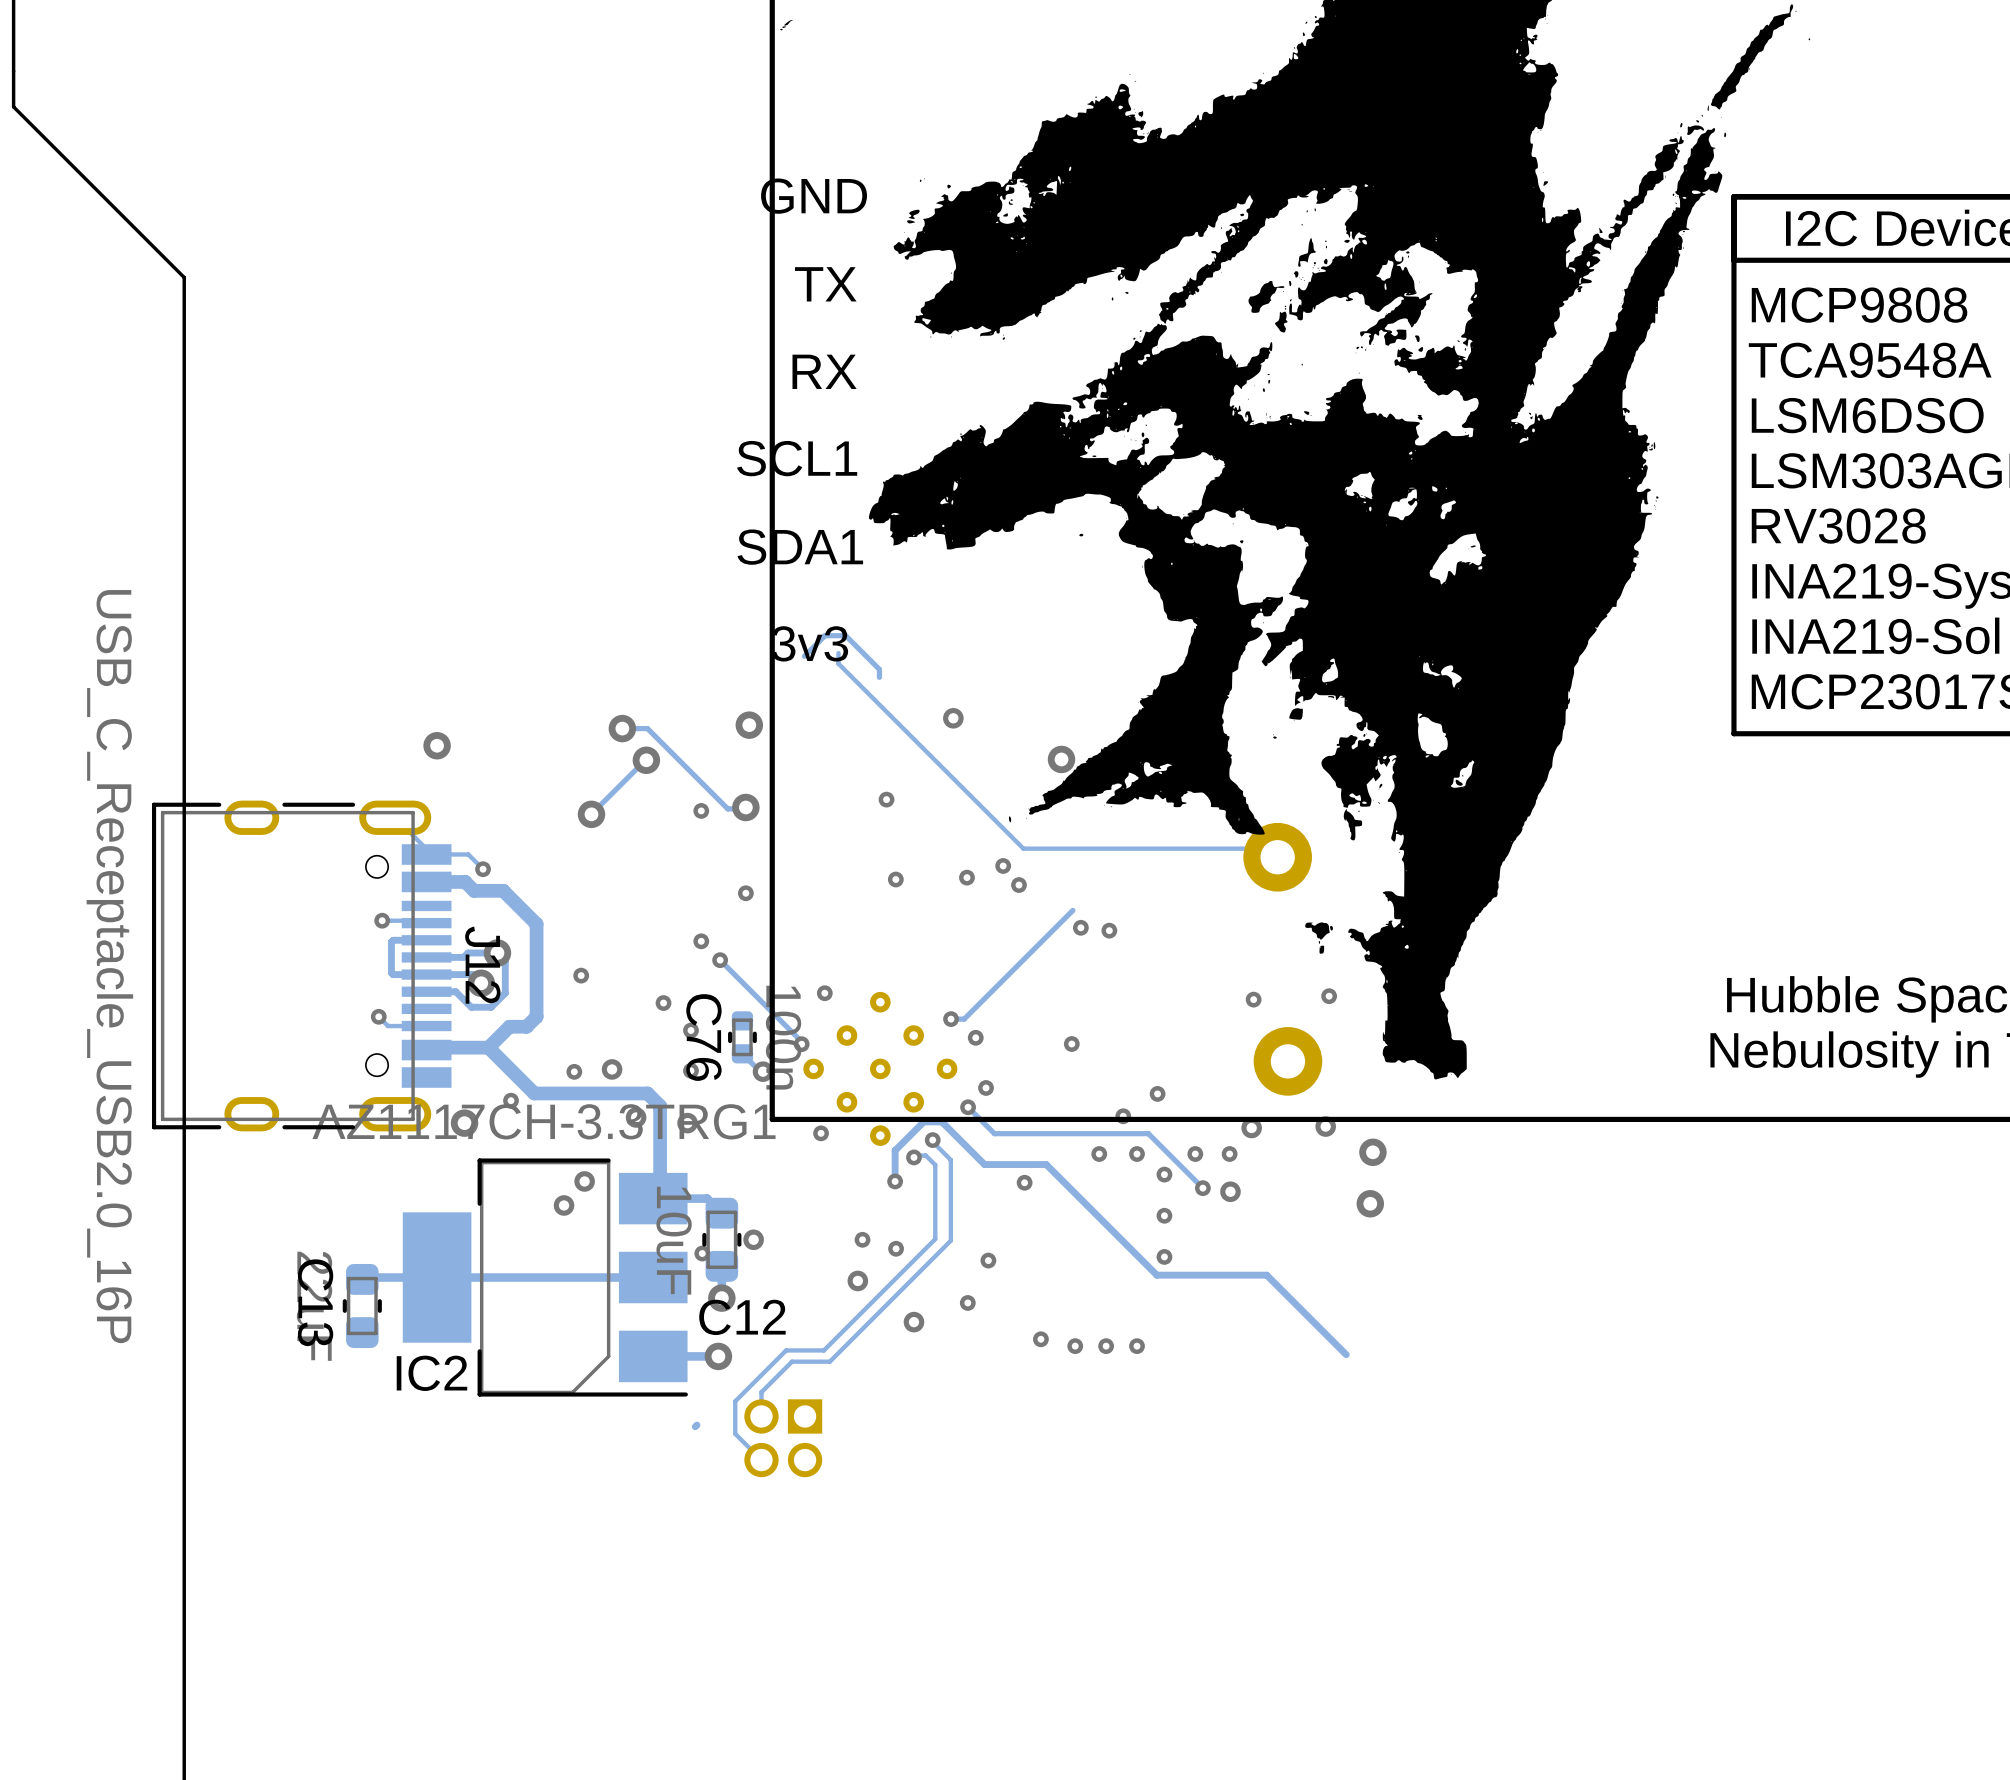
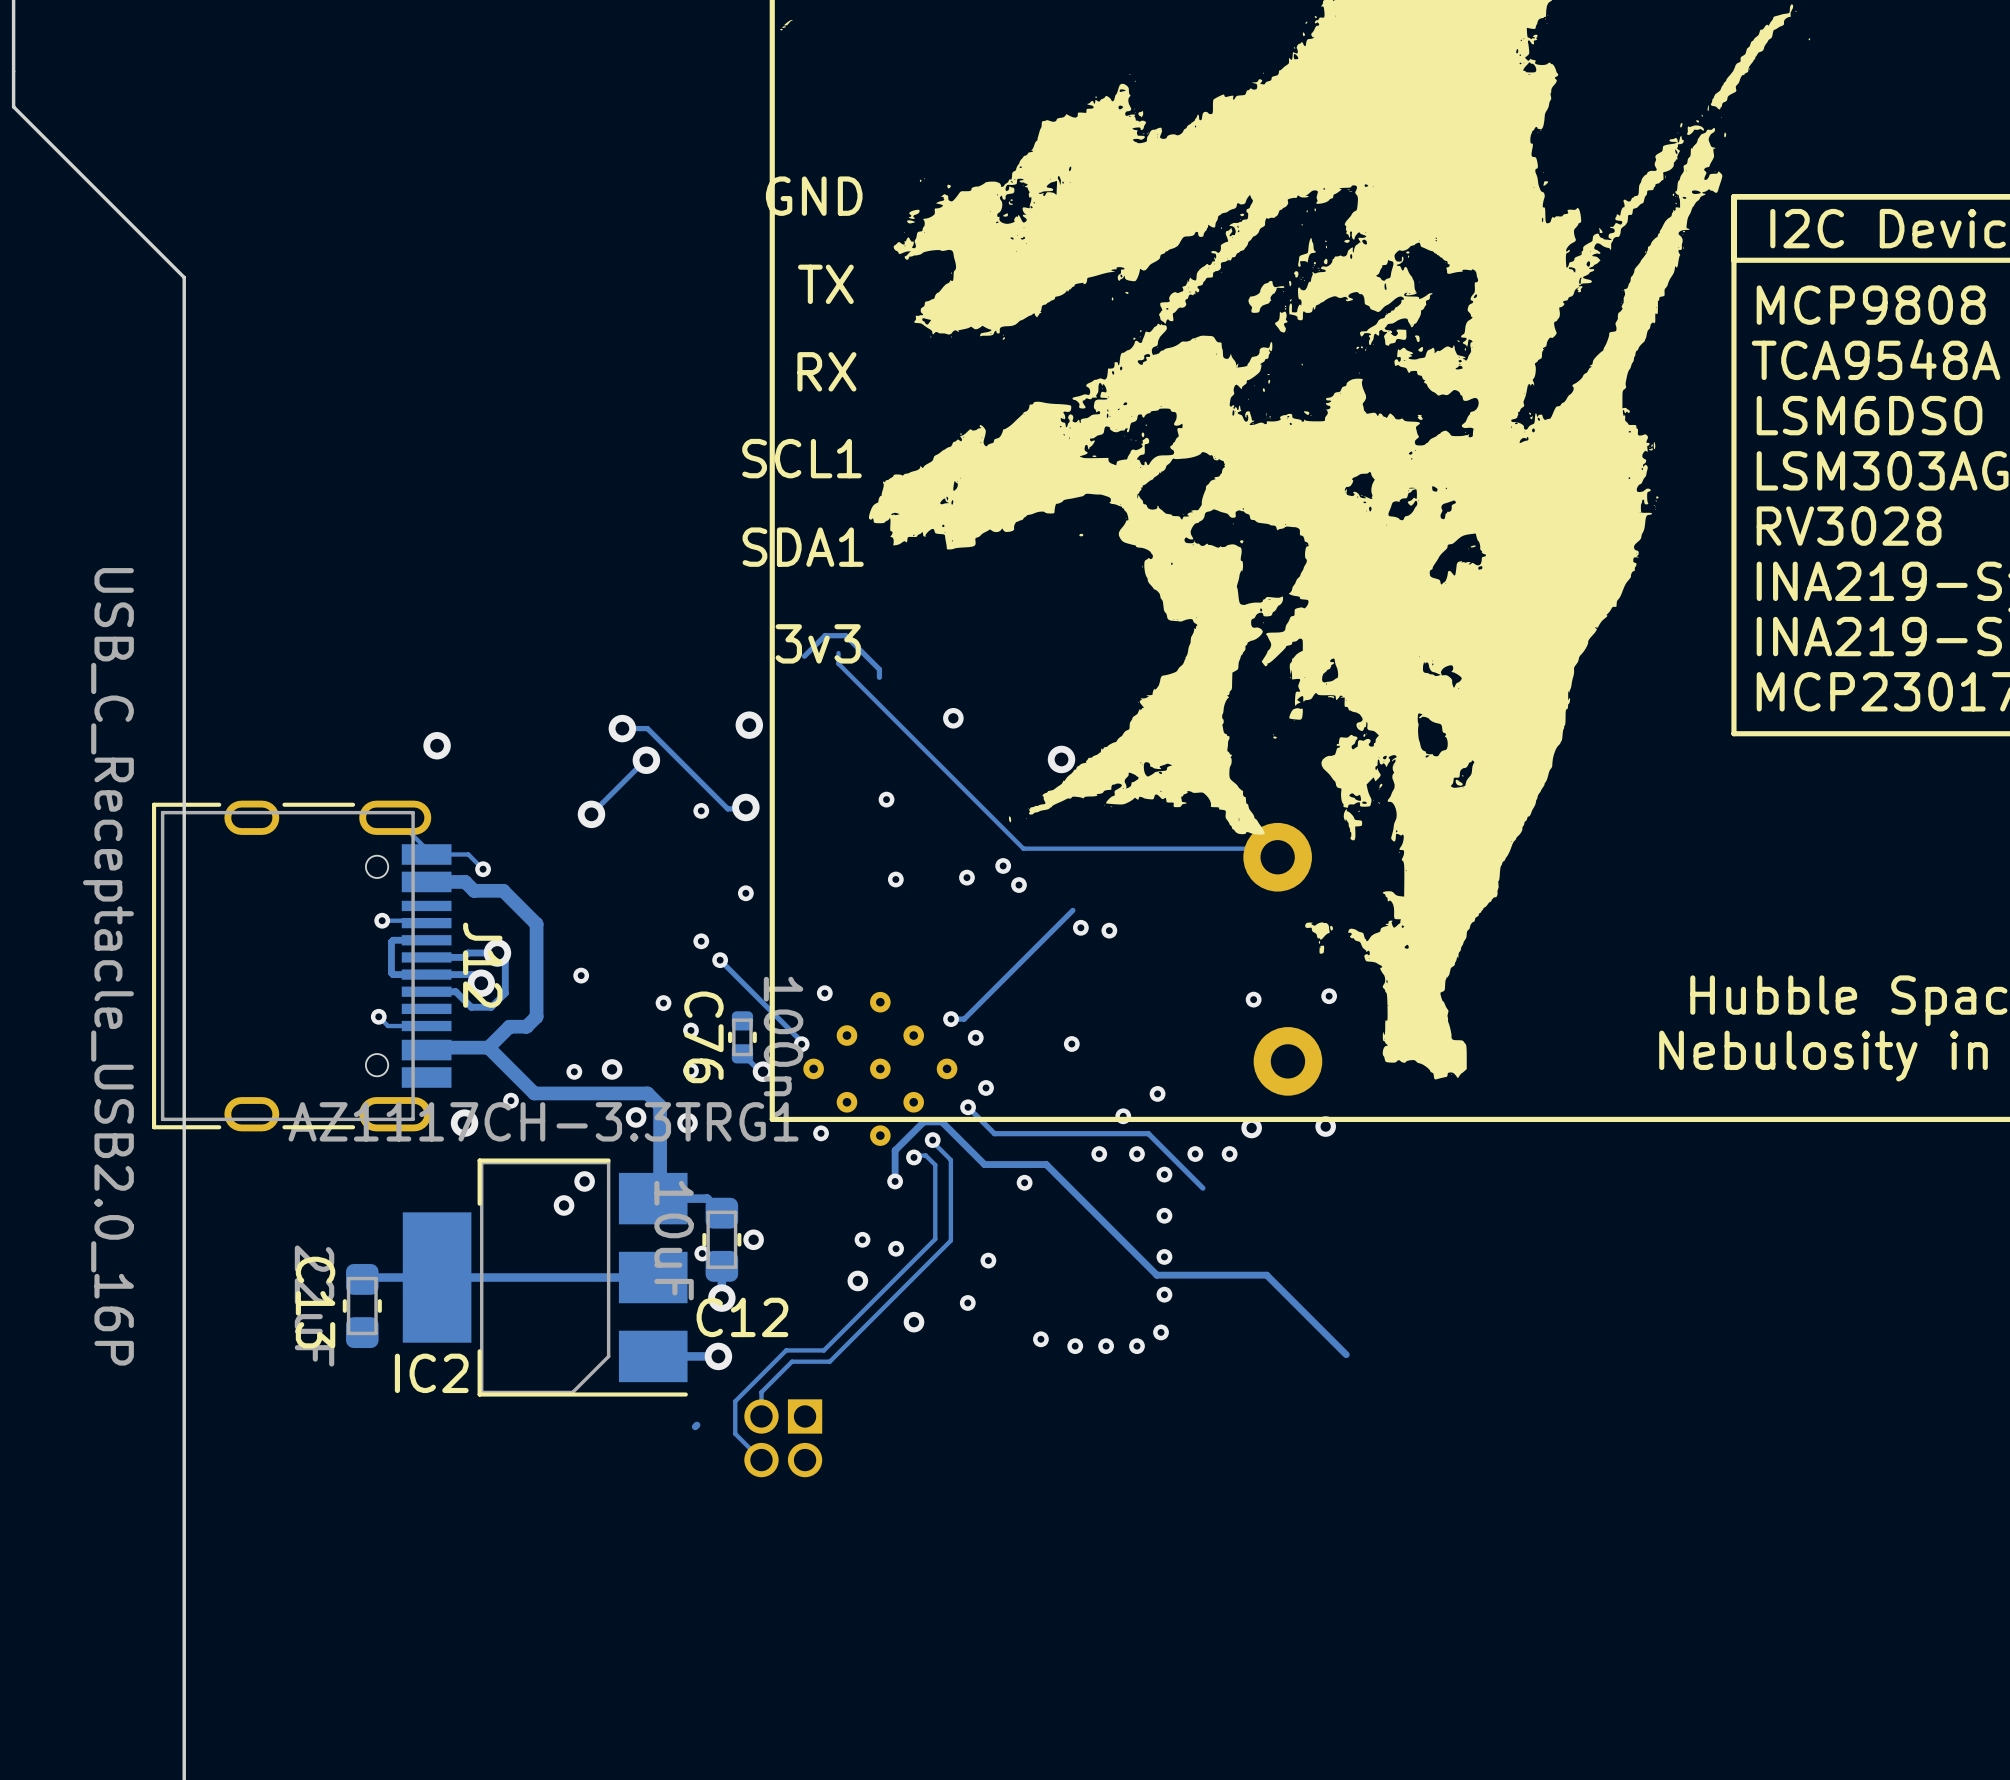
via: (1372, 1152) -> none
via: (1202, 1188) -> none
via: (1230, 1191) -> none
via: (1370, 1203) -> none
via: none -> (1164, 1294)
via: none -> (1161, 1332)

